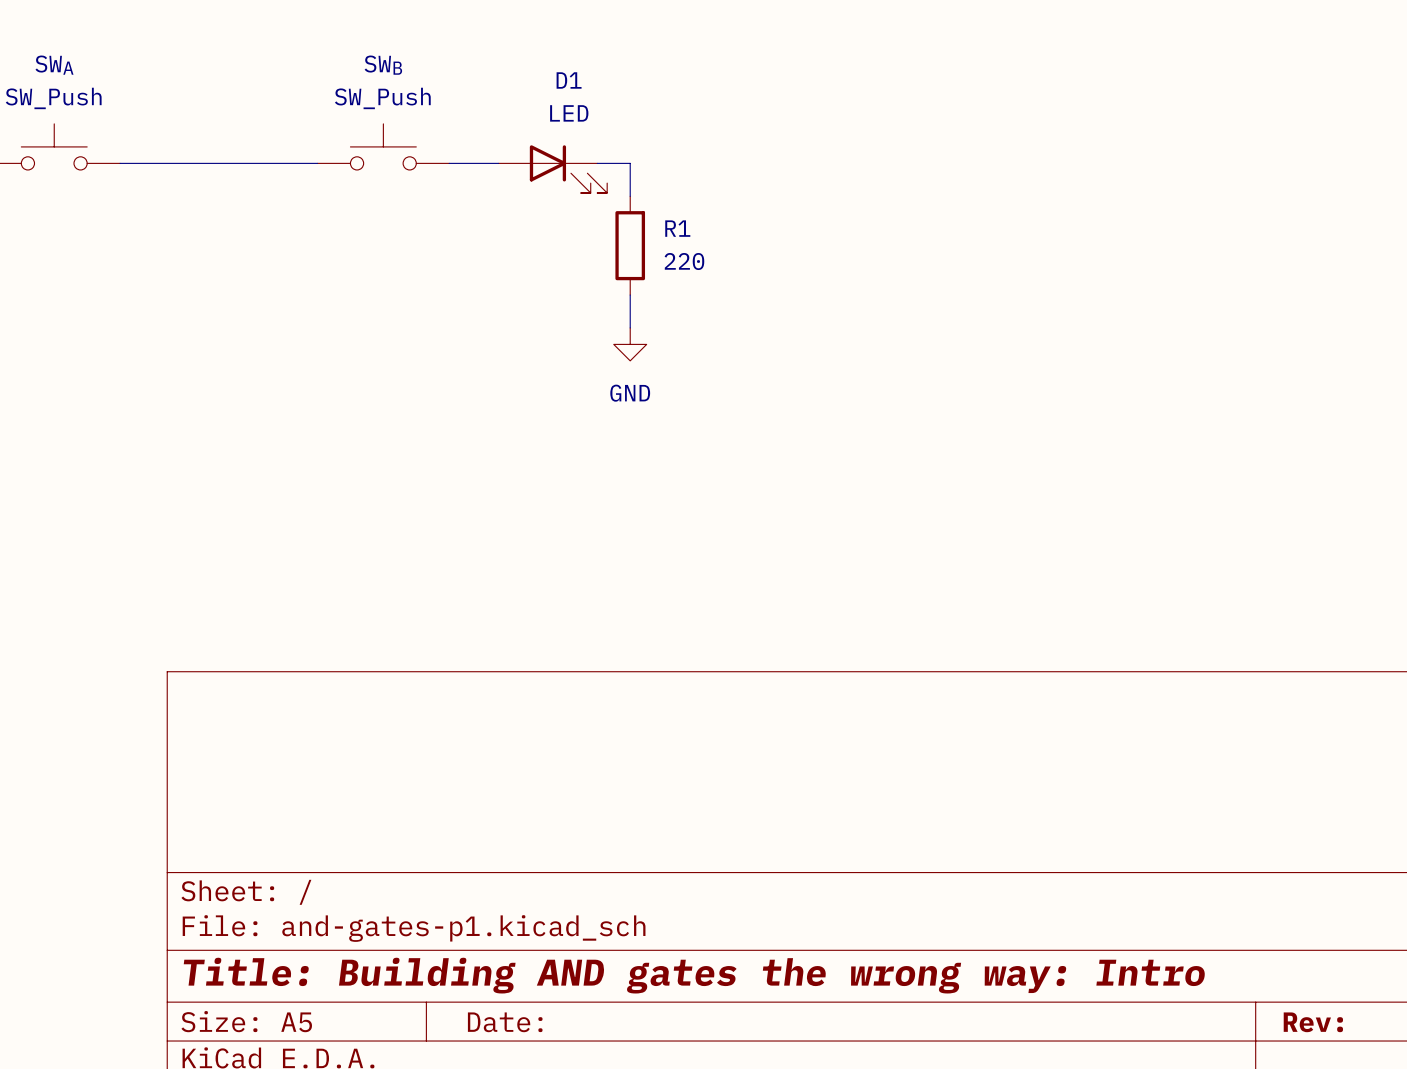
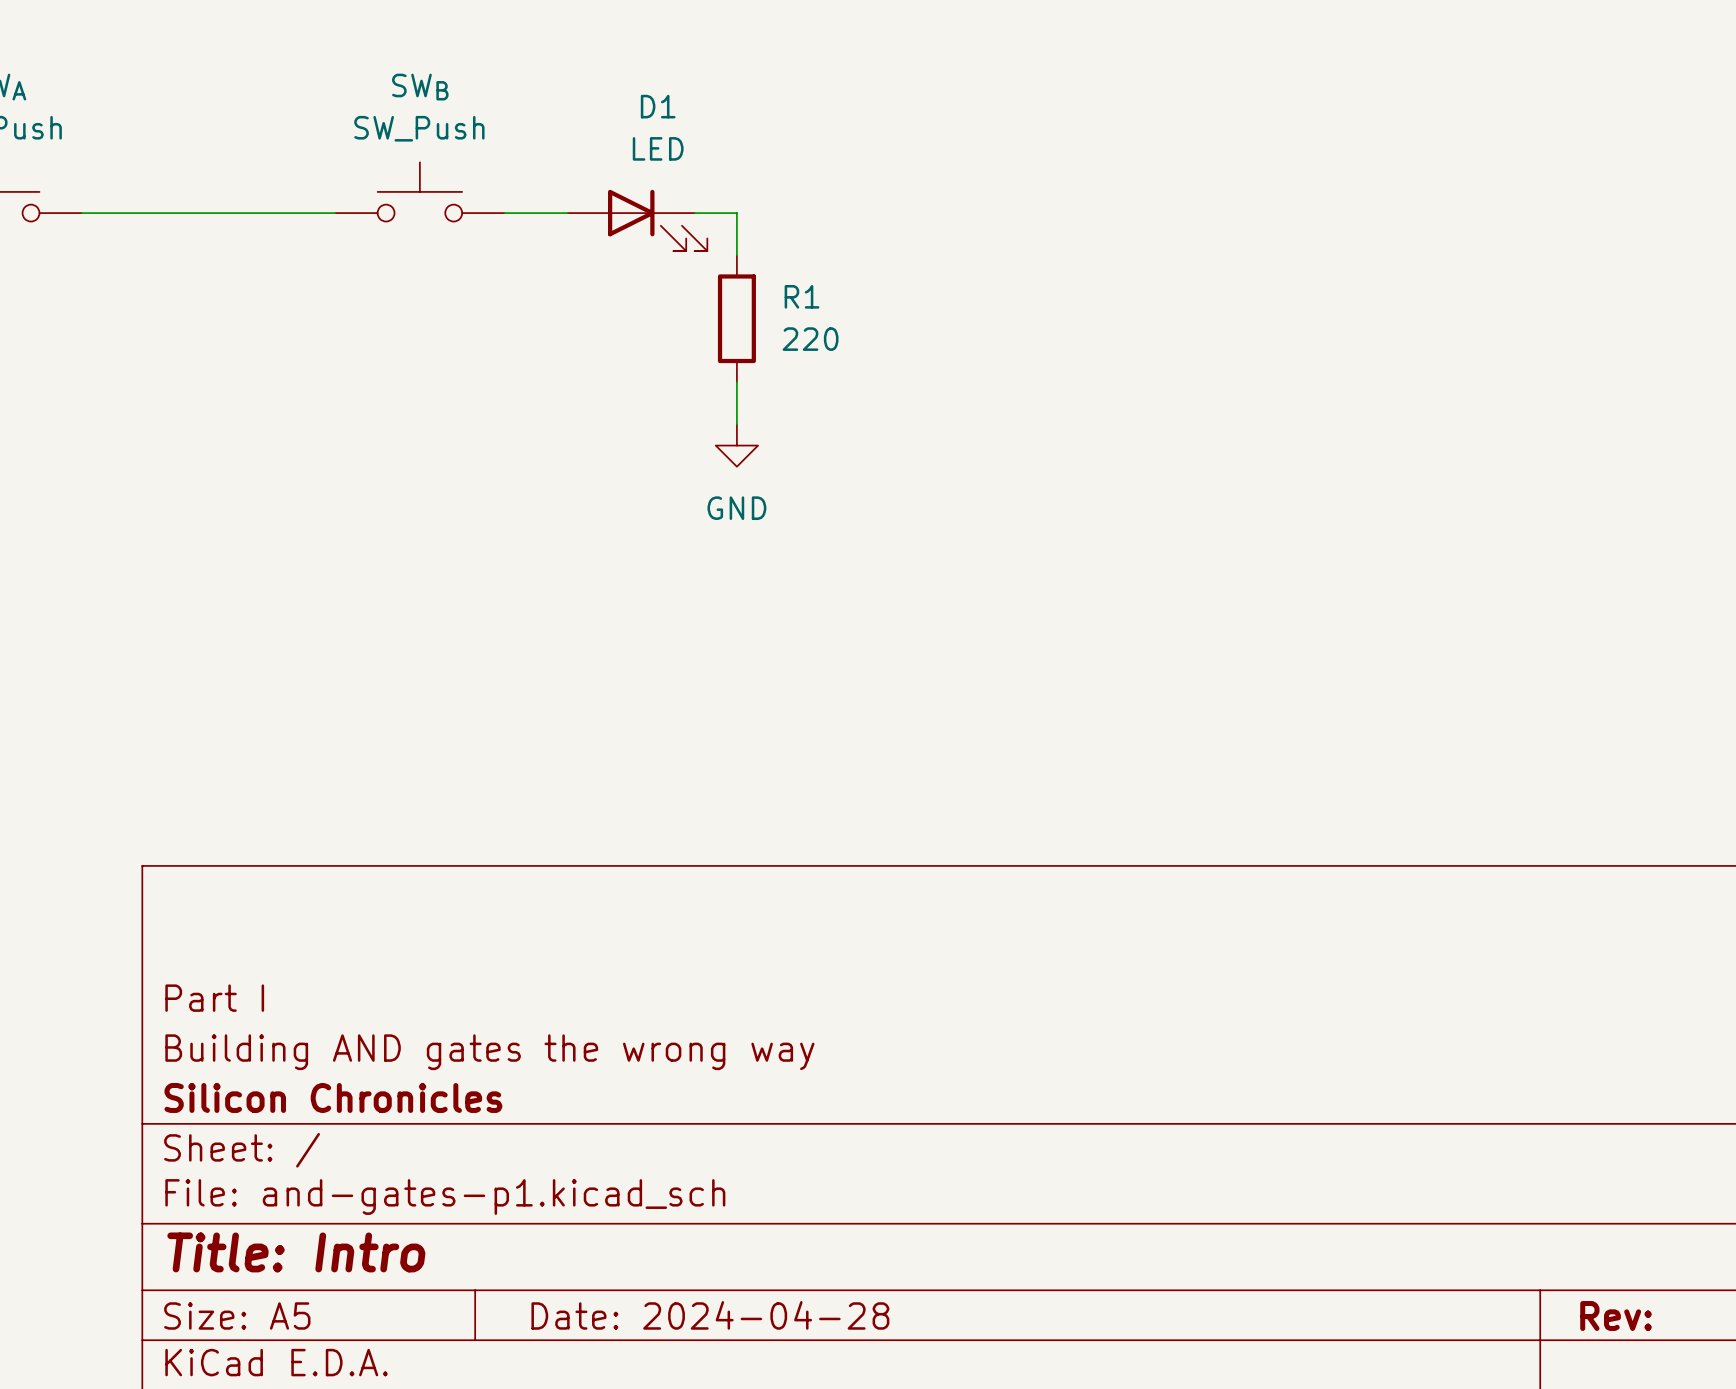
title block: none -> Part I (214, 998)
title block: none -> Building AND gates the wrong way (489, 1052)
title block: none -> Silicon Chronicles (333, 1097)
title block: Title: Building AND gates the wrong way: Intro (694, 975) -> Title: Intro (296, 1252)
title block: Date: (505, 1022) -> Date: 2024-04-28 (710, 1315)

